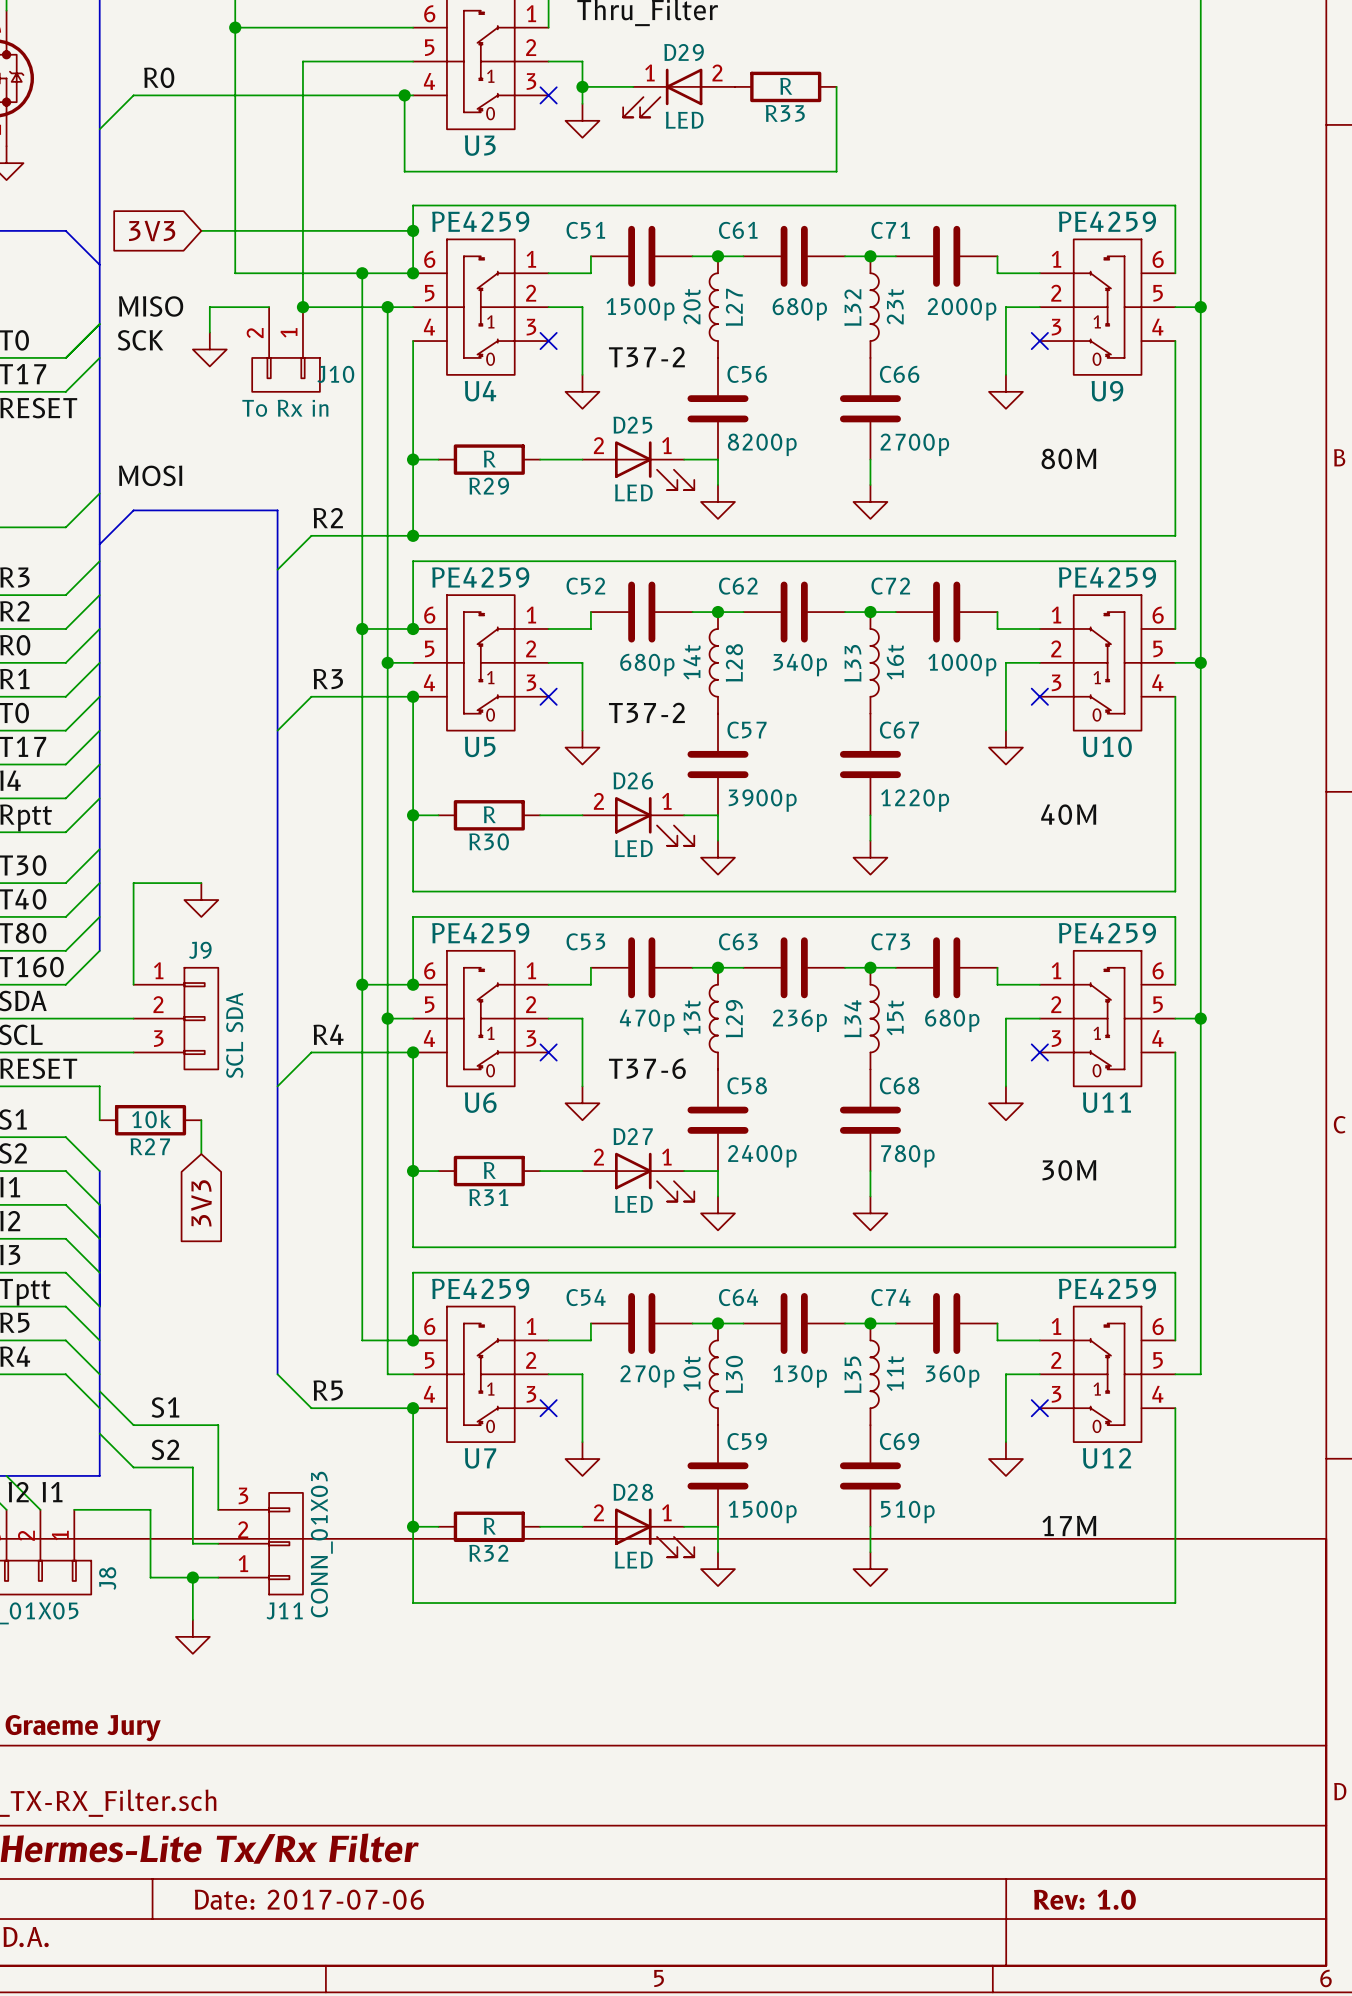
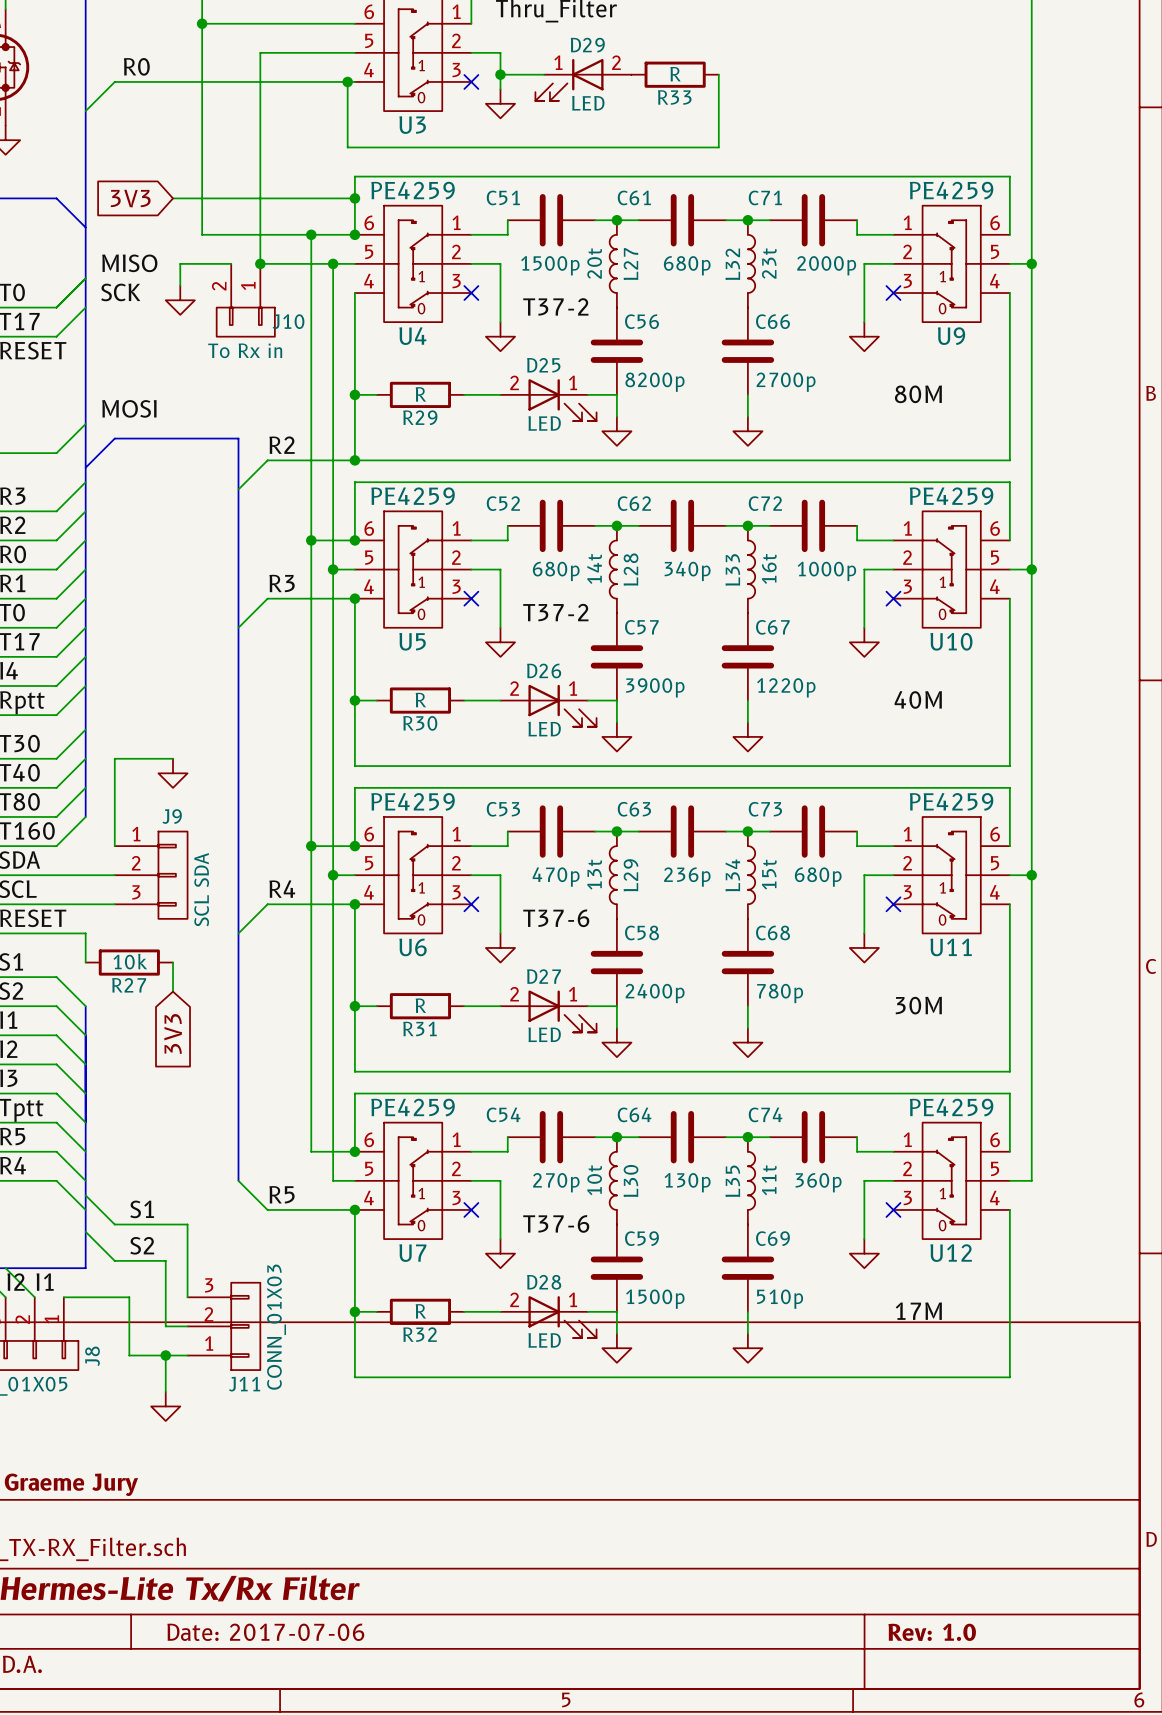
label: none -> T37-6 (556, 1223)

